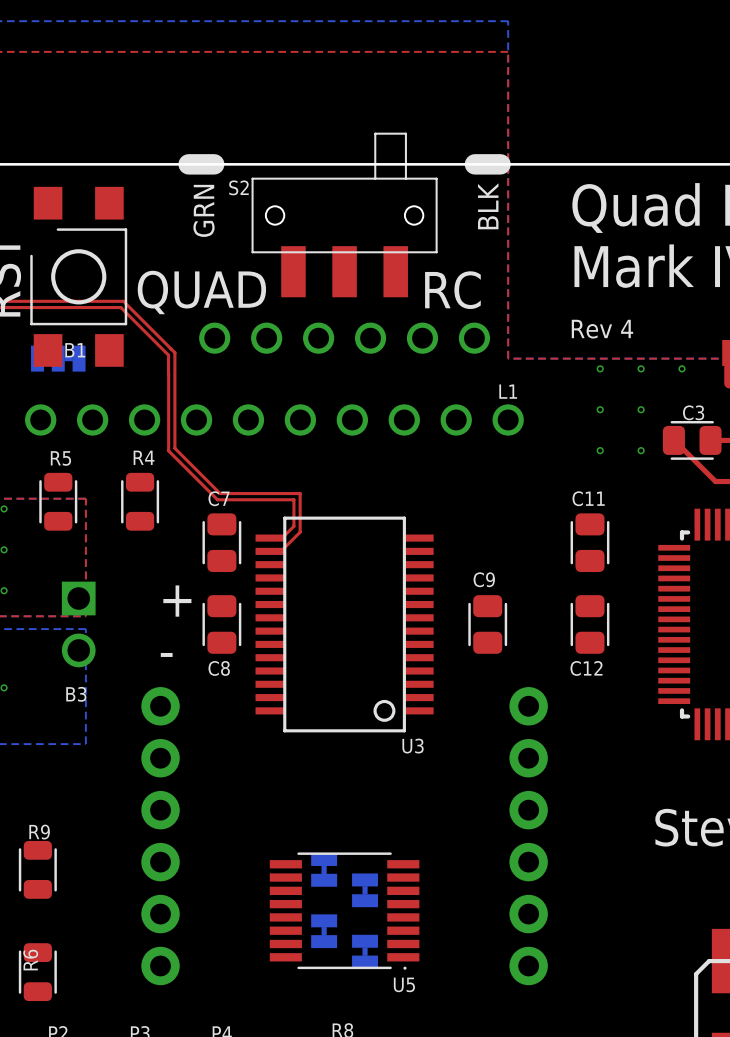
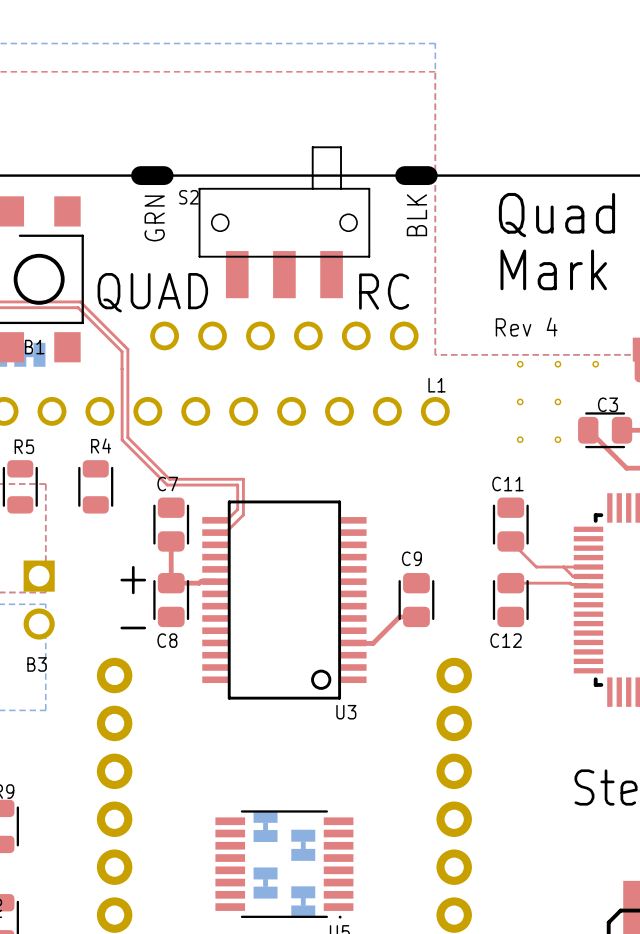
top track: none -> (171, 541) (171, 583) (215, 581)
top track: none -> (510, 541) (536, 567) (588, 567)
top track: none -> (563, 567) (573, 576) (588, 576)
top track: none -> (510, 583) (570, 583) (588, 585)
top track: none -> (416, 616) (399, 616) (373, 643) (353, 642)

